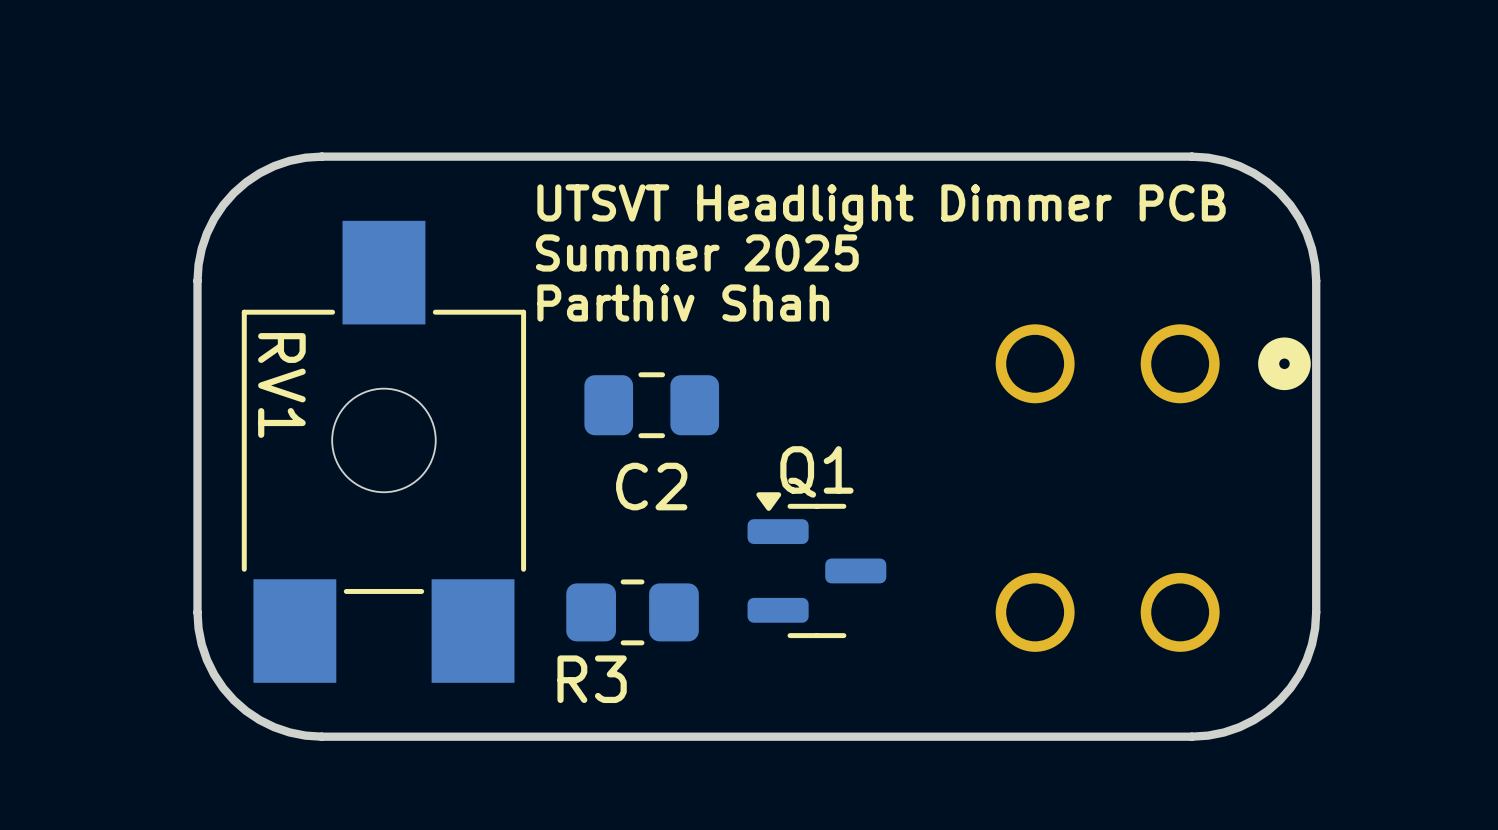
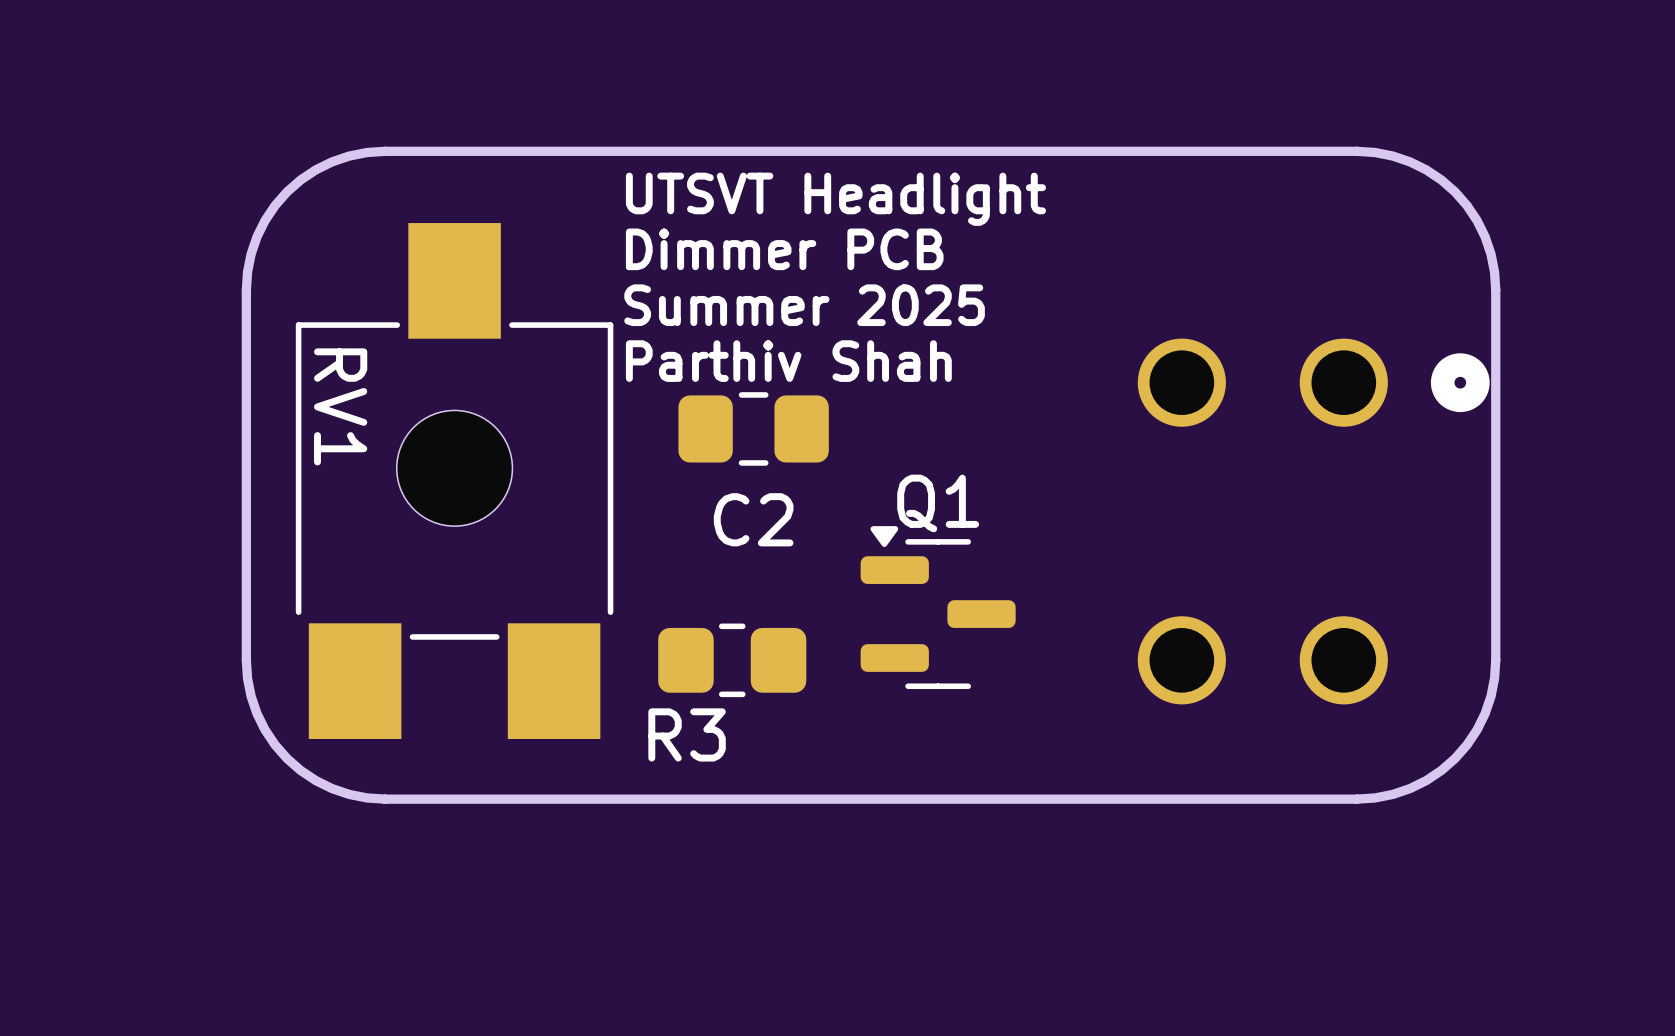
text: UTSVT Headlight Dimmer PCB (881, 208) -> UTSVT Headlight (835, 199)
text: none -> Dimmer PCB (784, 249)
text position: Summer 2025 (697, 252) -> Summer 2025 (804, 305)
text position: Parthiv Shah (683, 303) -> Parthiv Shah (788, 361)

